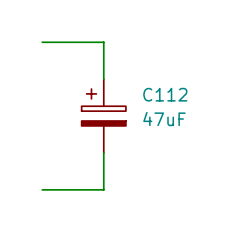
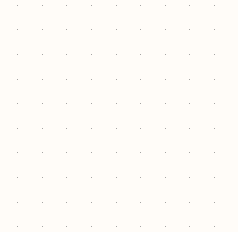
wire: (42, 42) (103, 42) (103, 79) -> none
C112: 47uF (103, 116) -> none
wire: (103, 152) (103, 189) (42, 189) -> none

